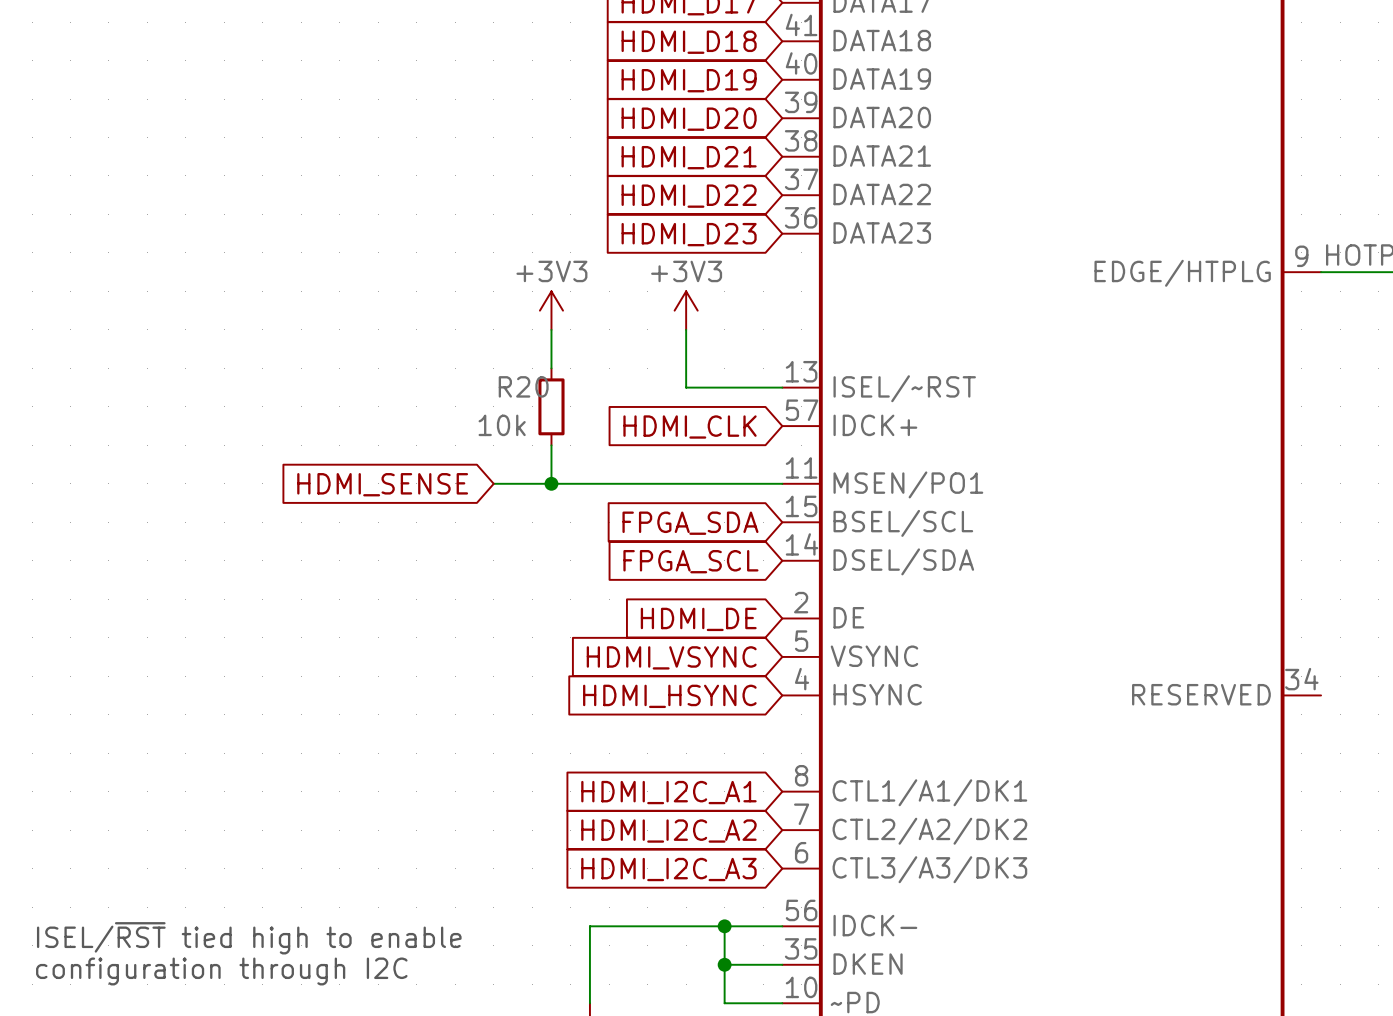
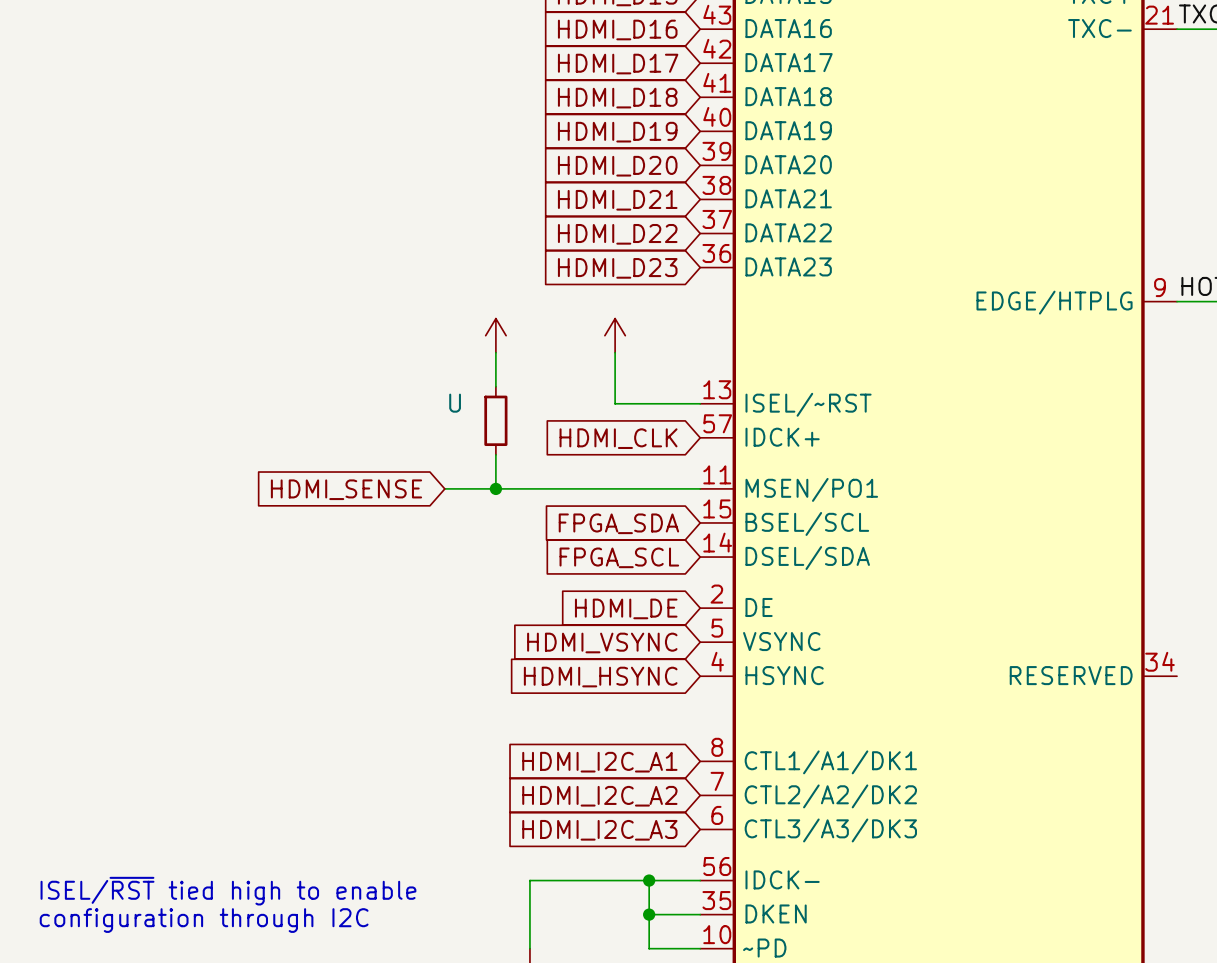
power symbol text: +3V3 (551, 271) -> none
power symbol text: +3V3 (686, 271) -> none
R20 name: R20 (523, 386) -> U (455, 403)
R20 value: 10k (502, 425) -> none

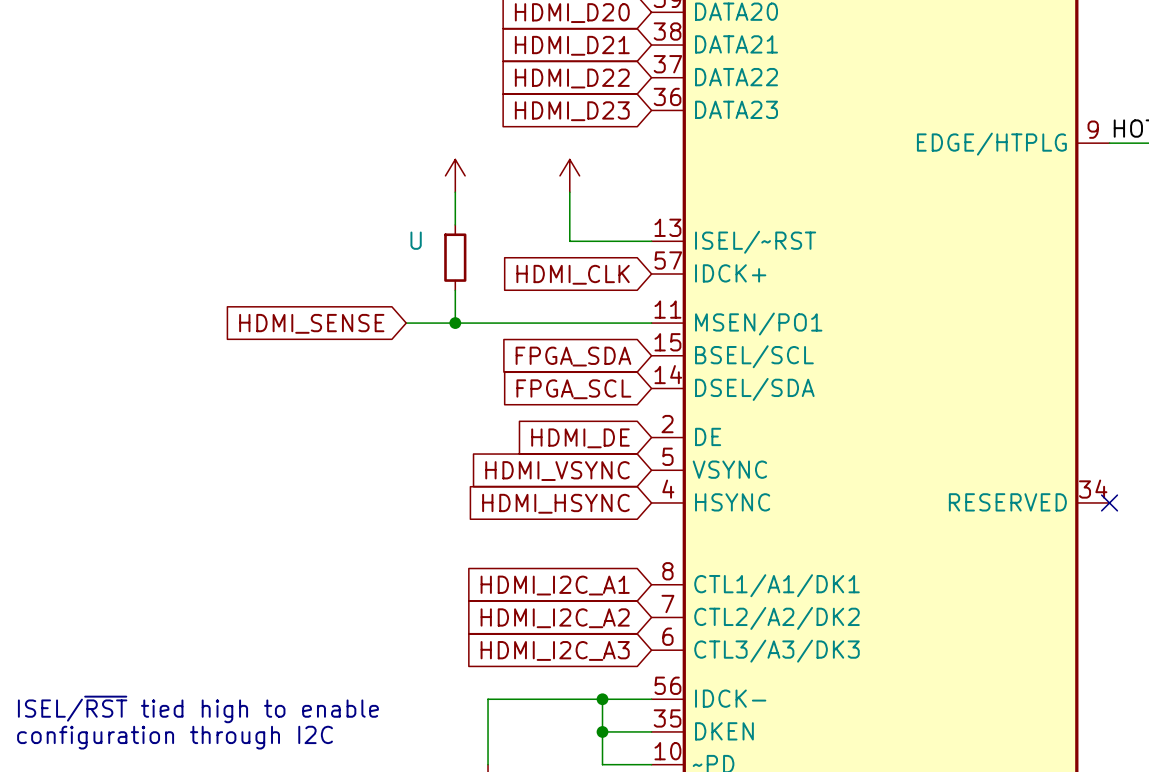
no-connect mark: none -> (1109, 502)

